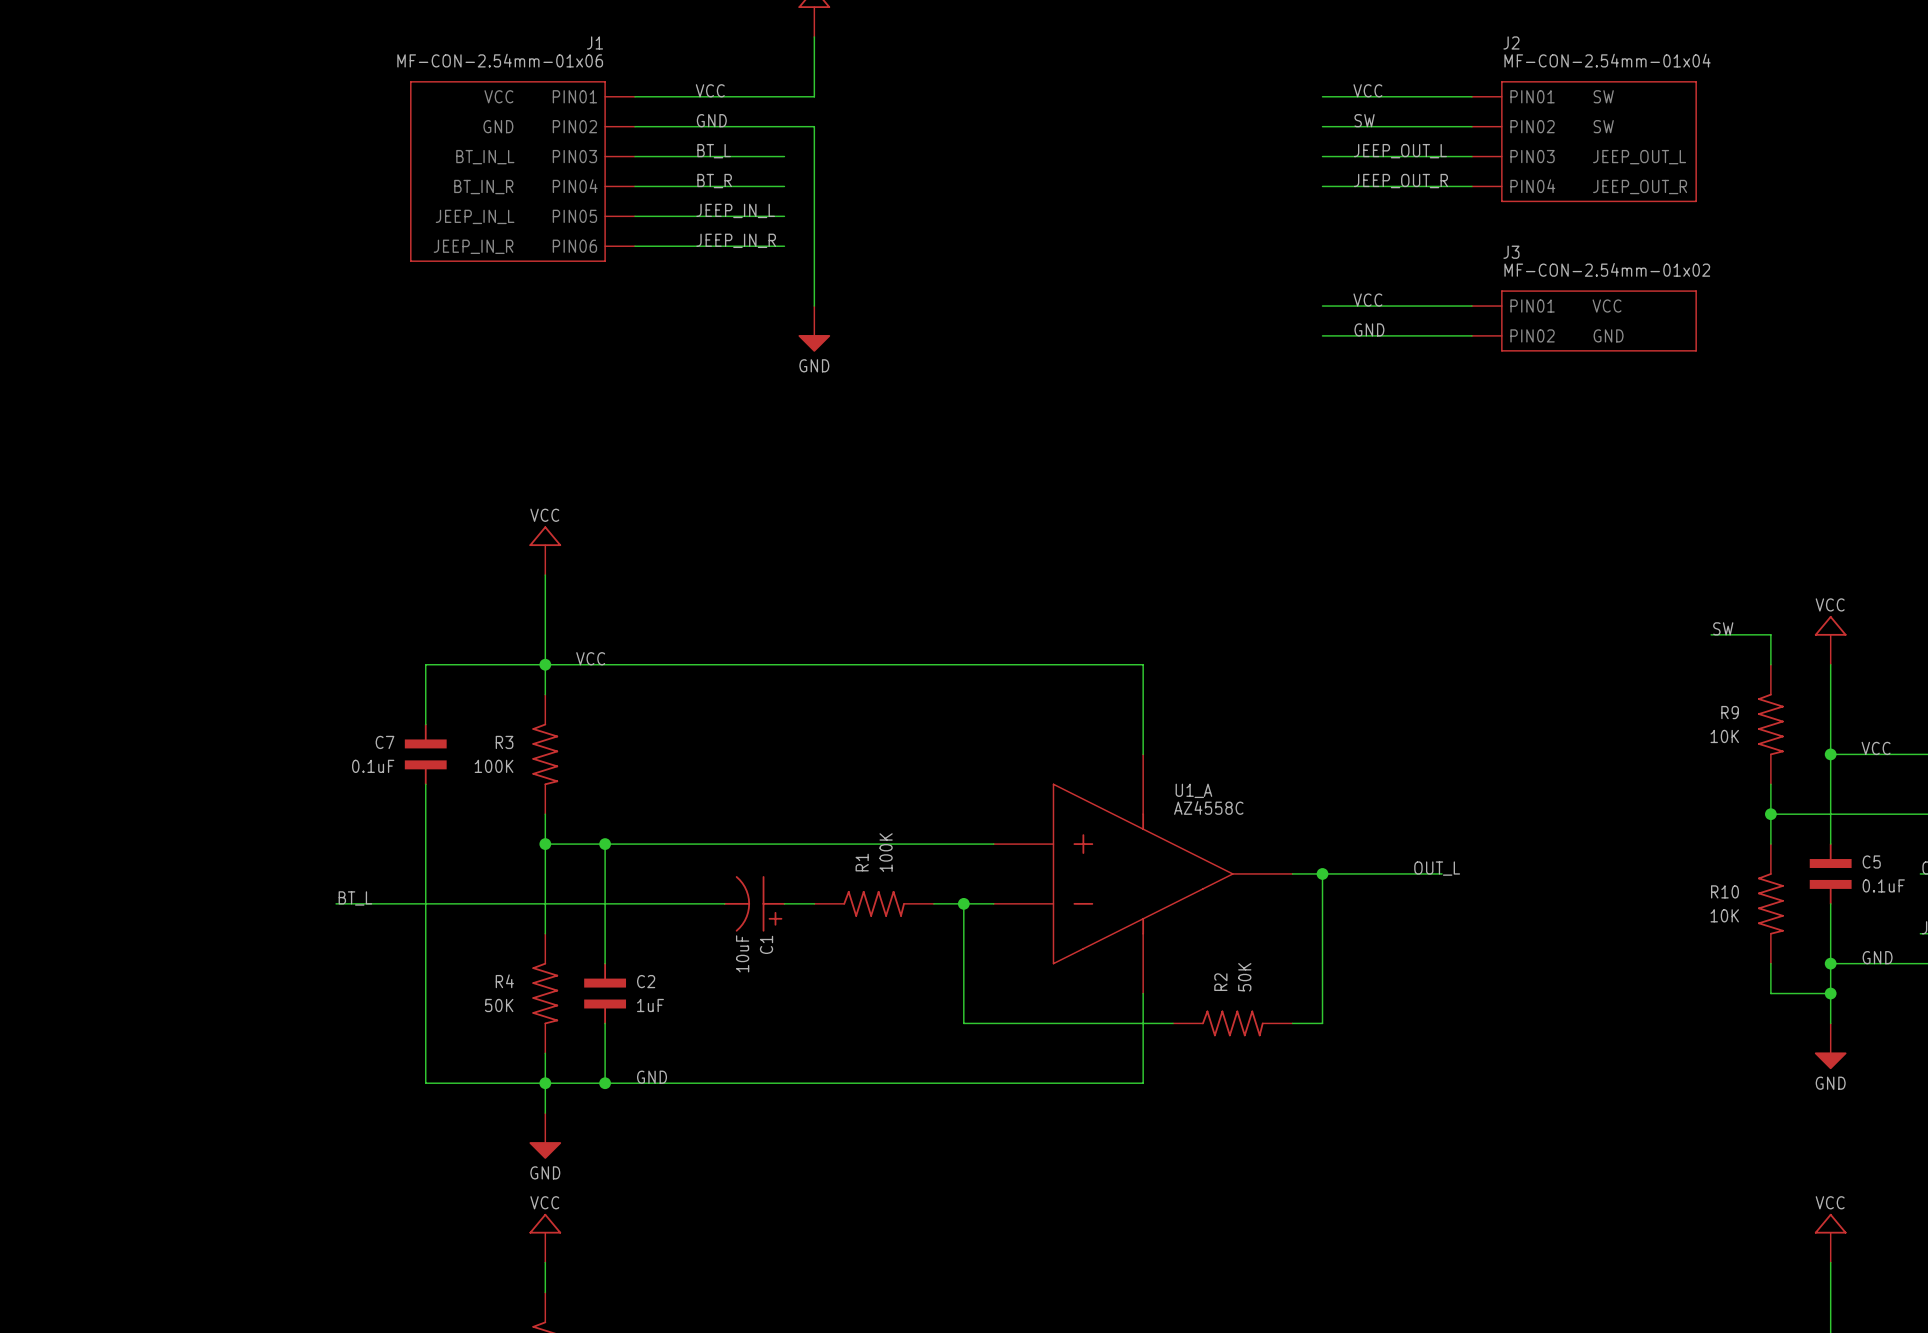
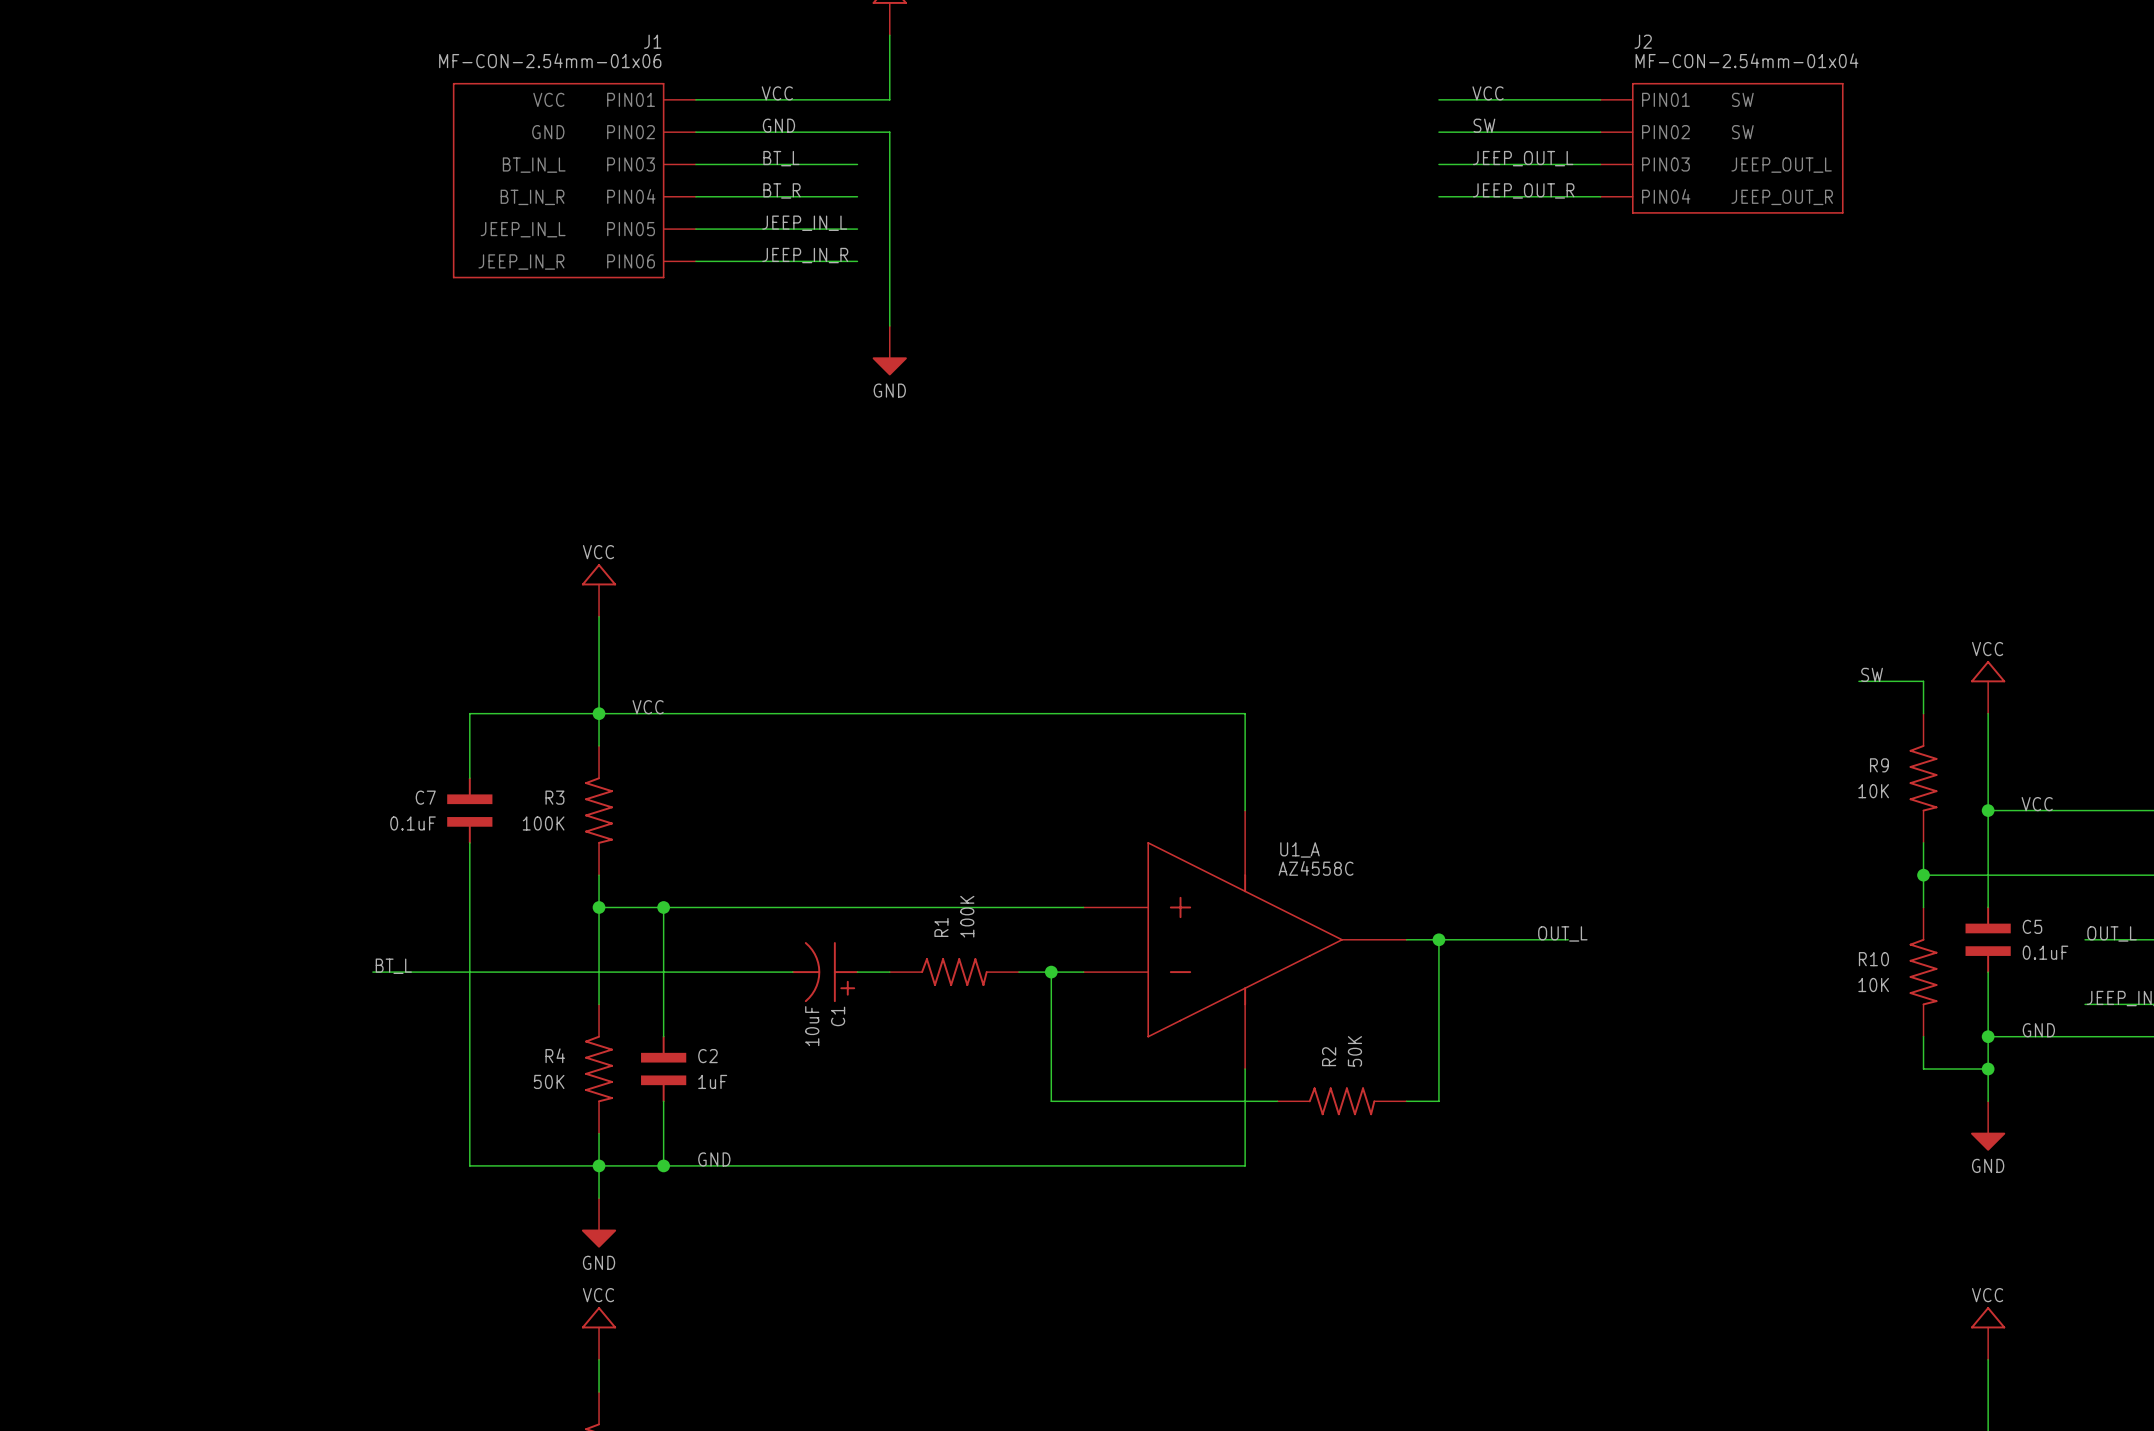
label: VCC (1367, 300) -> none
wire: (1322, 306) (1471, 306) -> none
J3: MF-CON-2.54mm-01x02 (1584, 320) -> none
label: GND (1369, 329) -> none
wire: (1322, 335) (1471, 335) -> none

